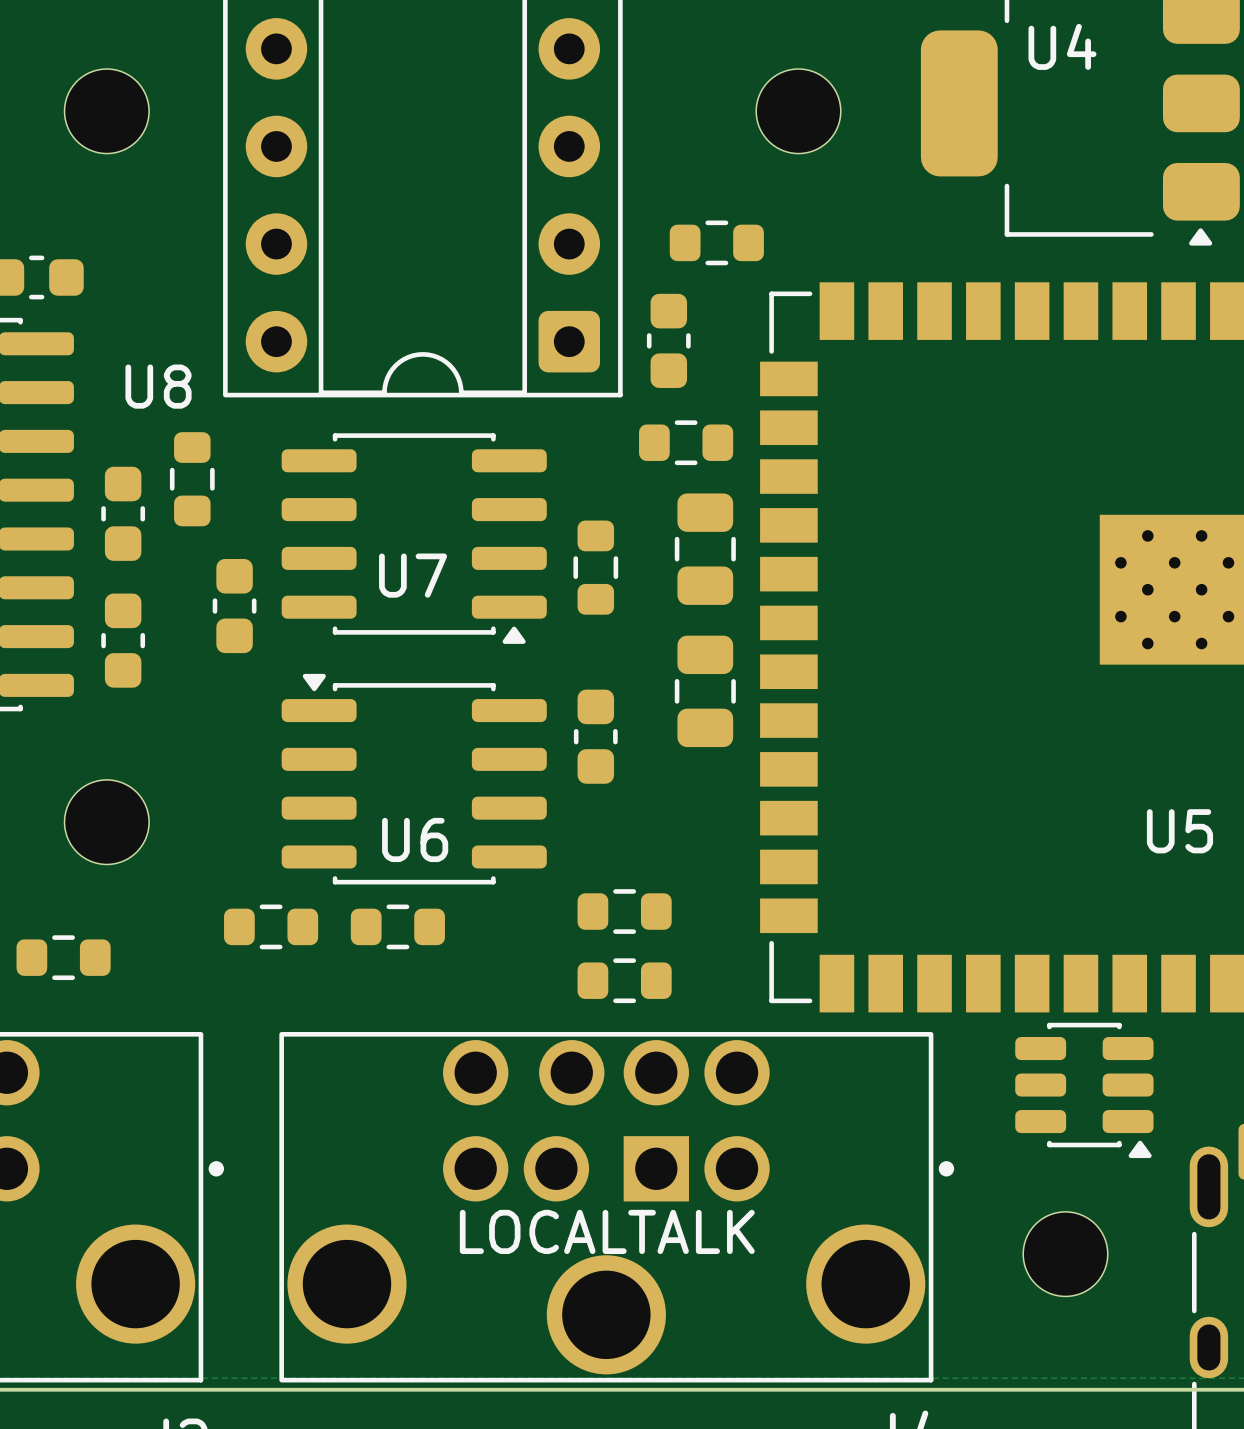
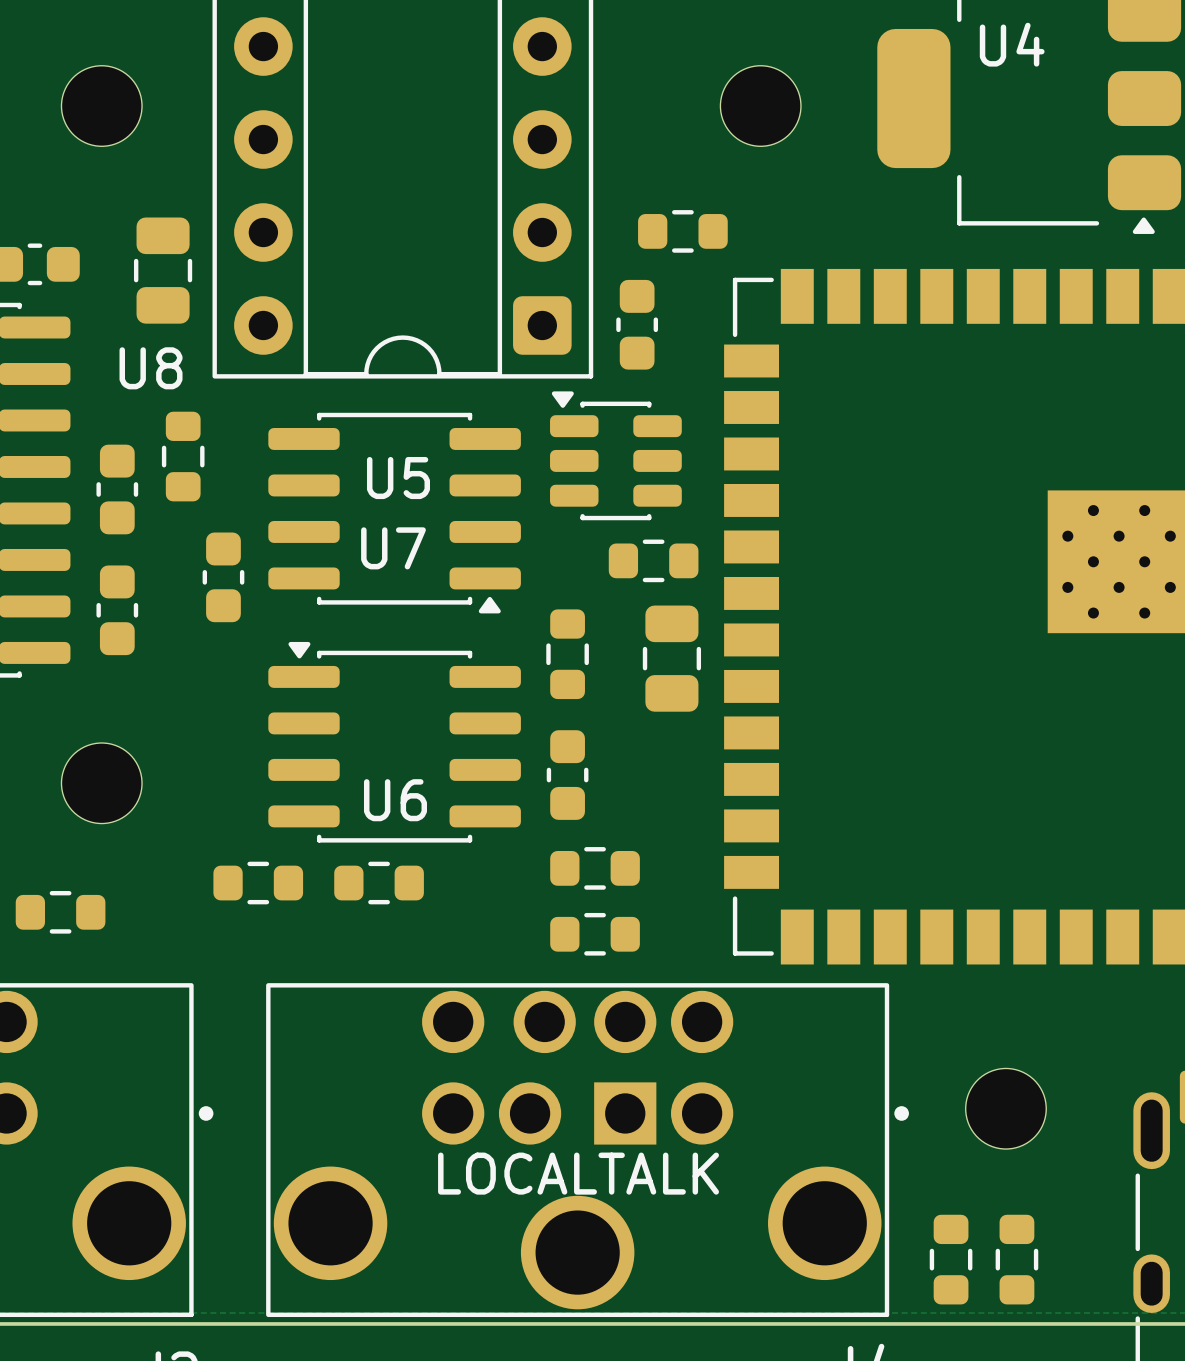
part: (686, 442) -> none
part position: (705, 549) -> (163, 270)
part: (595, 567) -> none
part: none -> (653, 560)
part: none -> (567, 654)
part position: (595, 736) -> (567, 775)
U5 name position: U5 (1179, 831) -> U5 (398, 478)
U5 rotation: 0° (1084, 1090) -> 180° (615, 455)
U5 position: (1084, 1090) -> (615, 455)
part position: (1065, 1254) -> (1005, 1108)
part: none -> (951, 1259)
part: none -> (1016, 1259)

